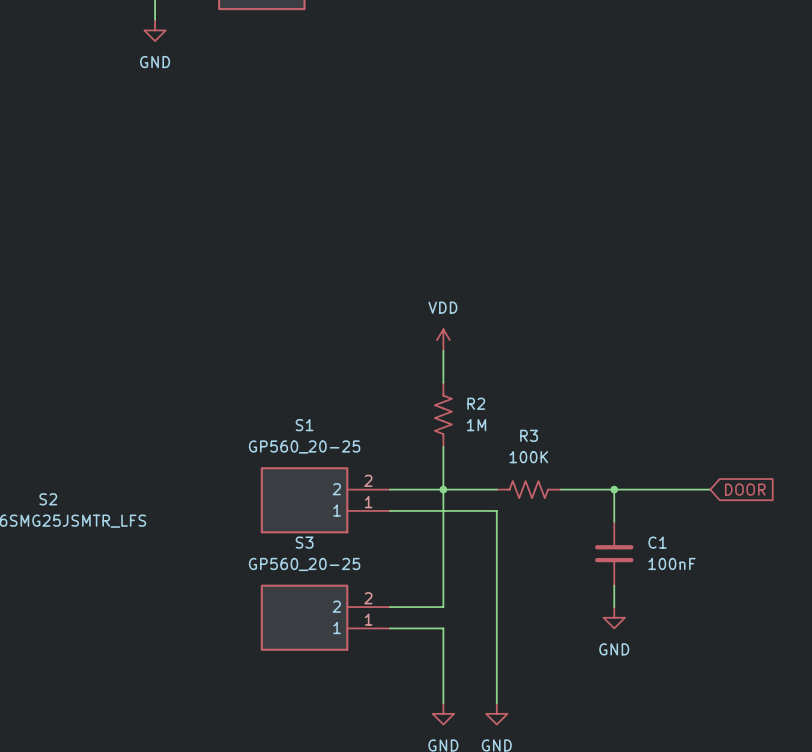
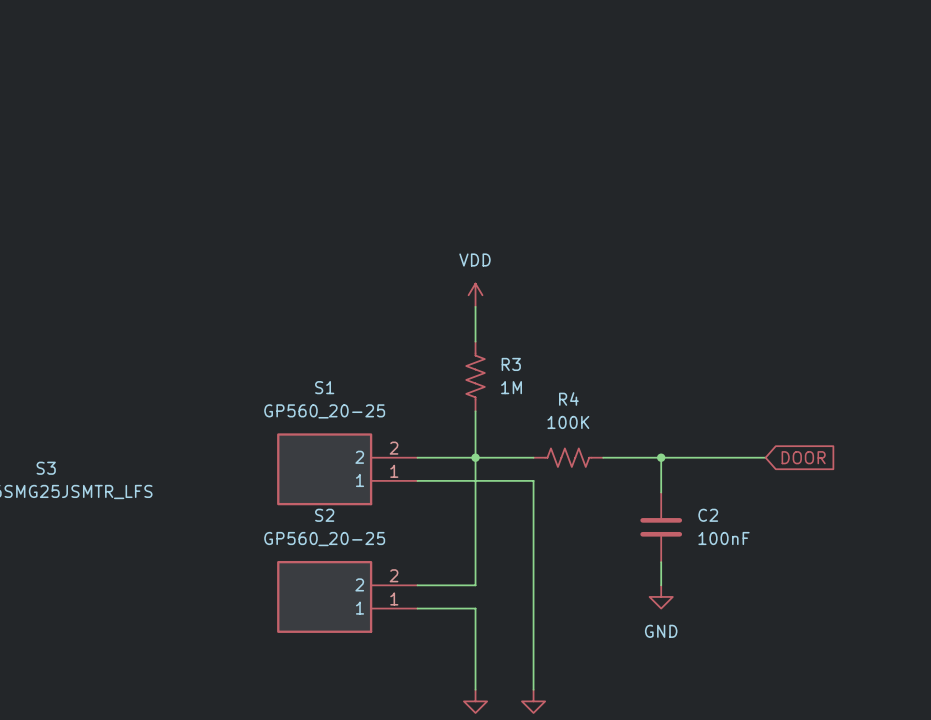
R2 name: R2 (476, 403) -> R3 (511, 364)
R3 name: R3 (529, 435) -> R4 (568, 398)
S2 name: S2 (48, 499) -> S3 (46, 468)
S3 name: S3 (304, 542) -> S2 (324, 515)
C1 name: C1 (657, 542) -> C2 (708, 515)

